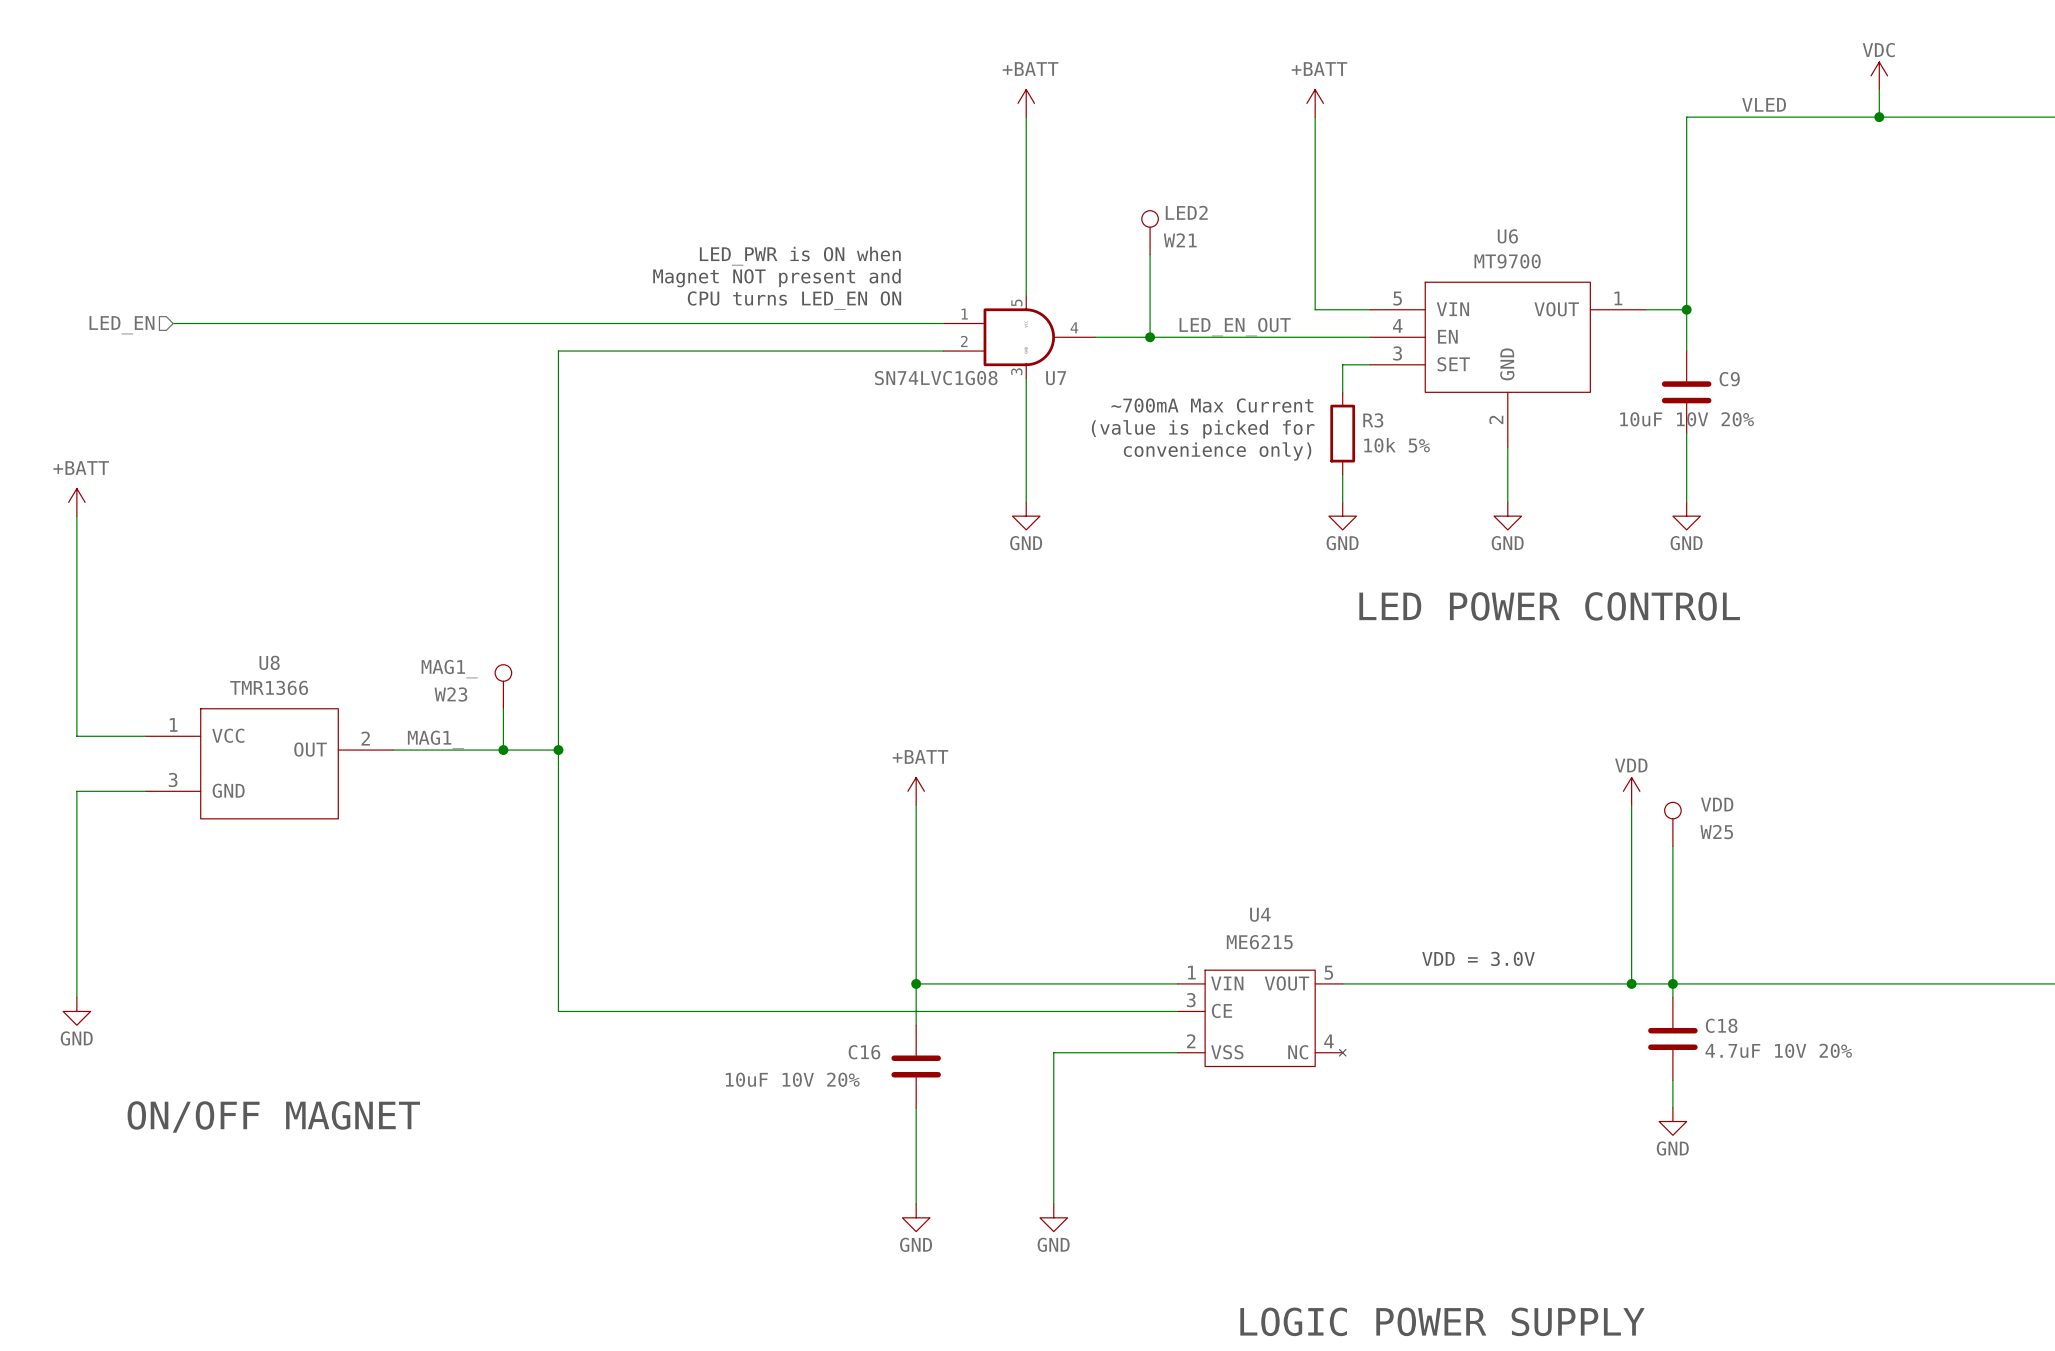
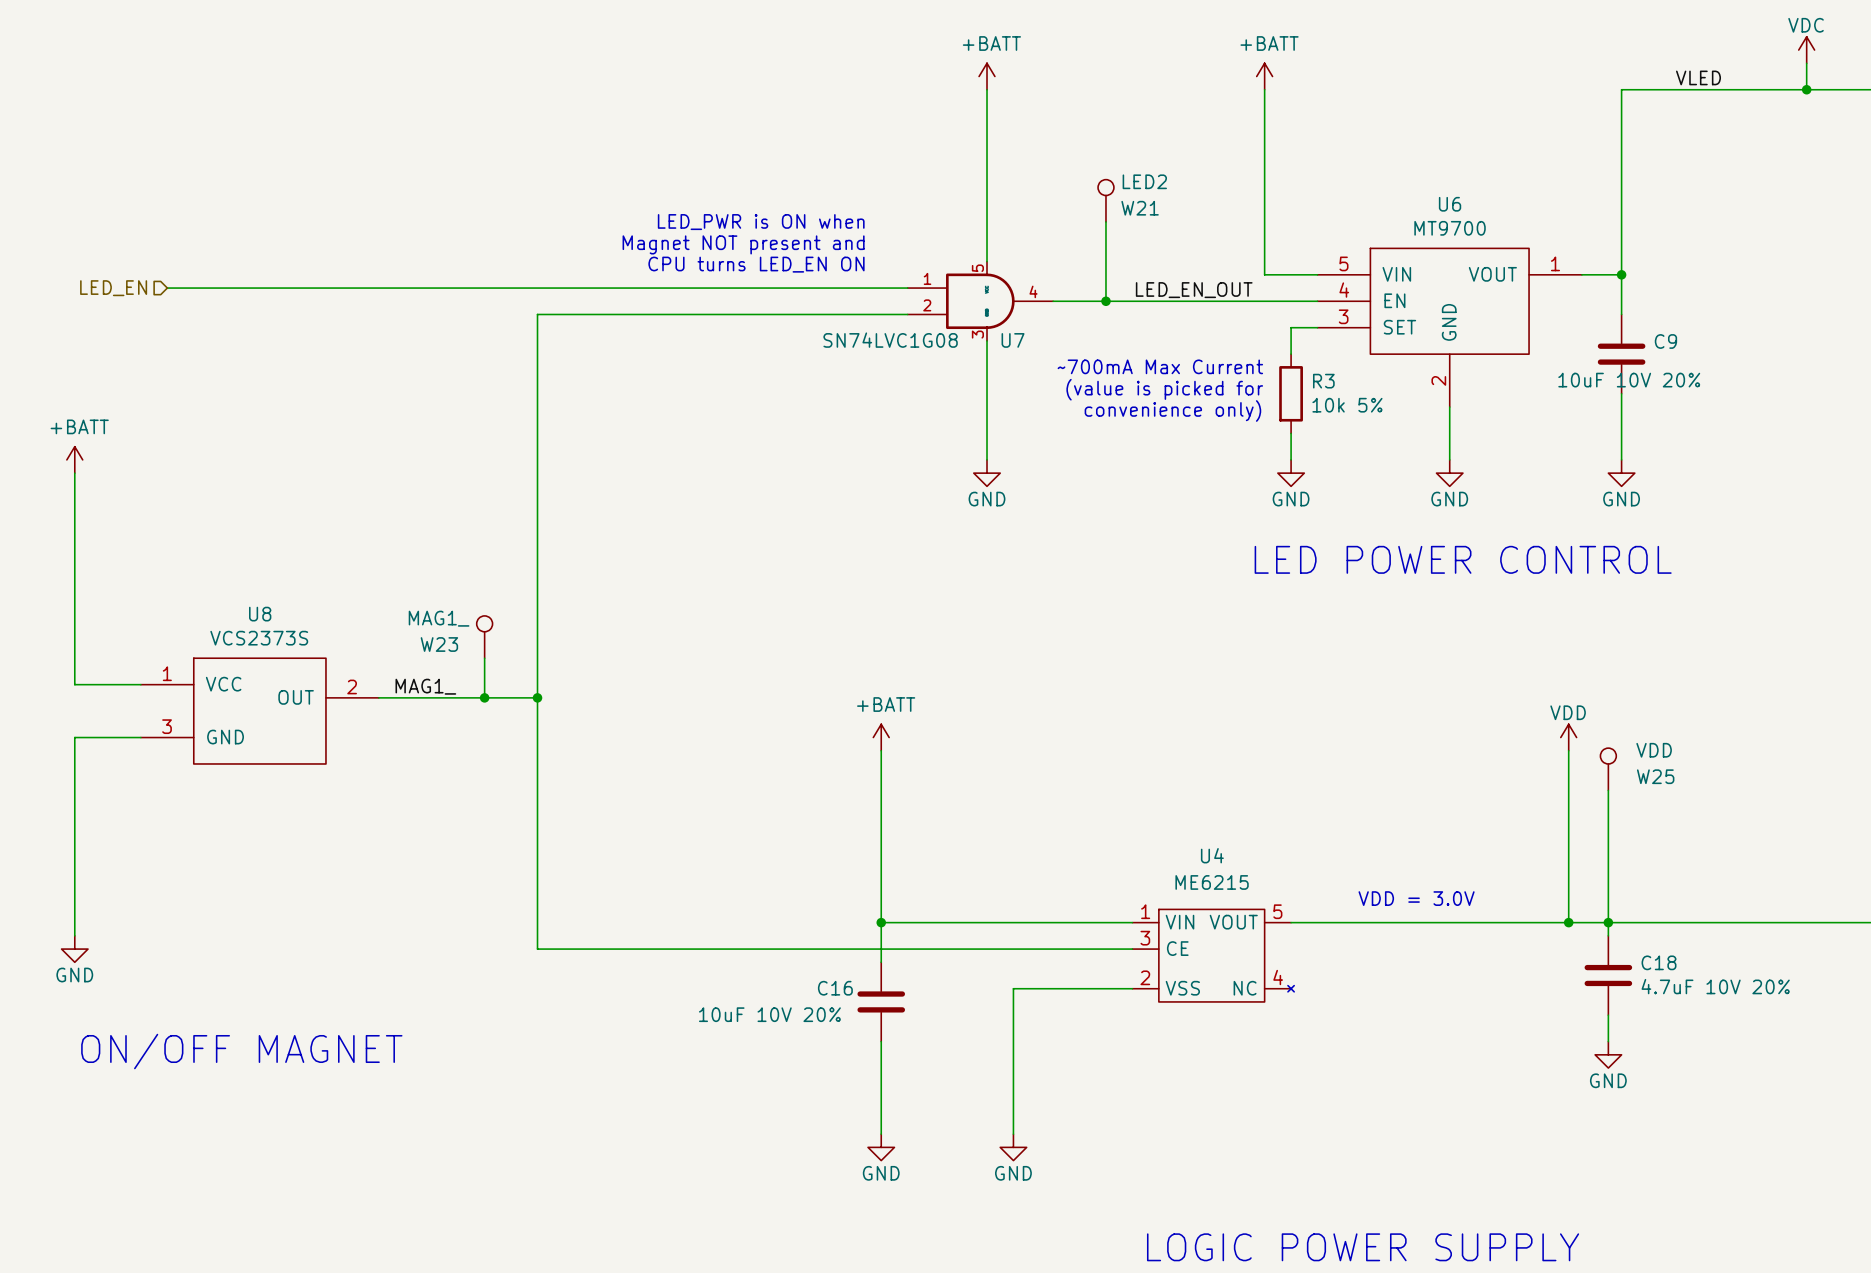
U8 value: TMR1366 (269, 687) -> VCS2373S (259, 638)

